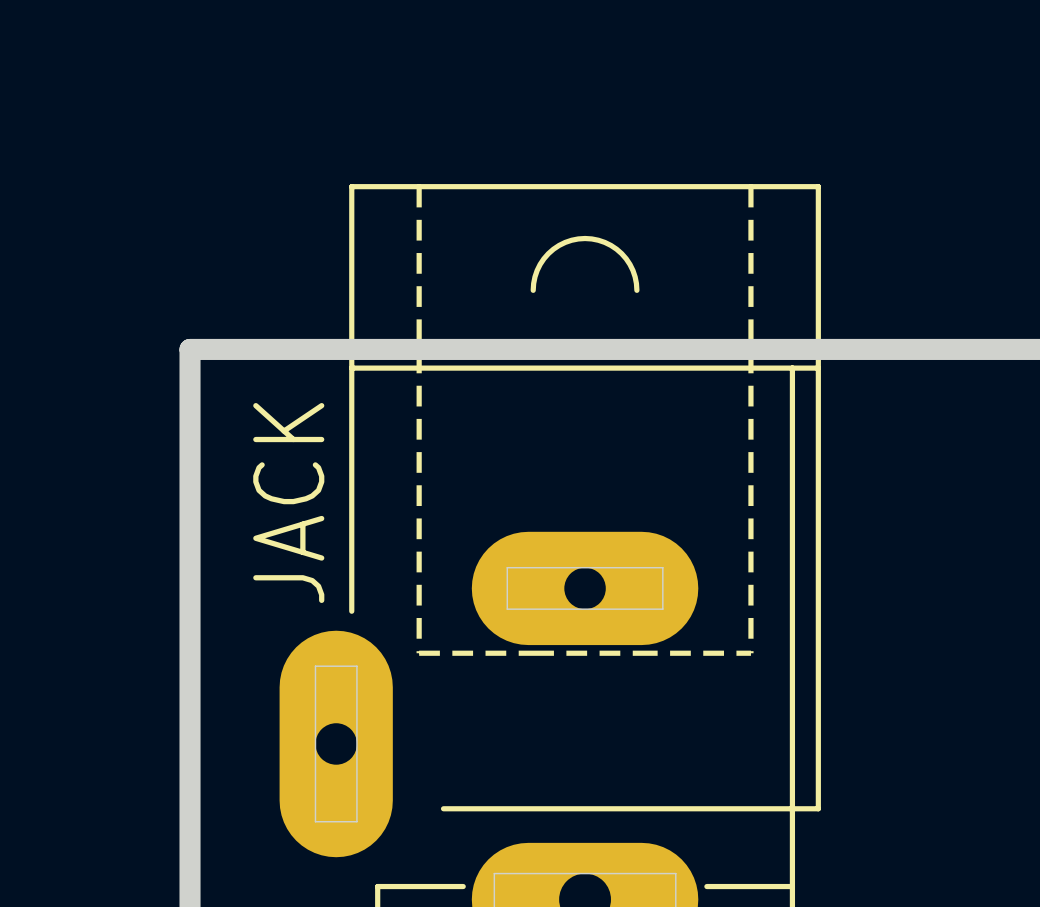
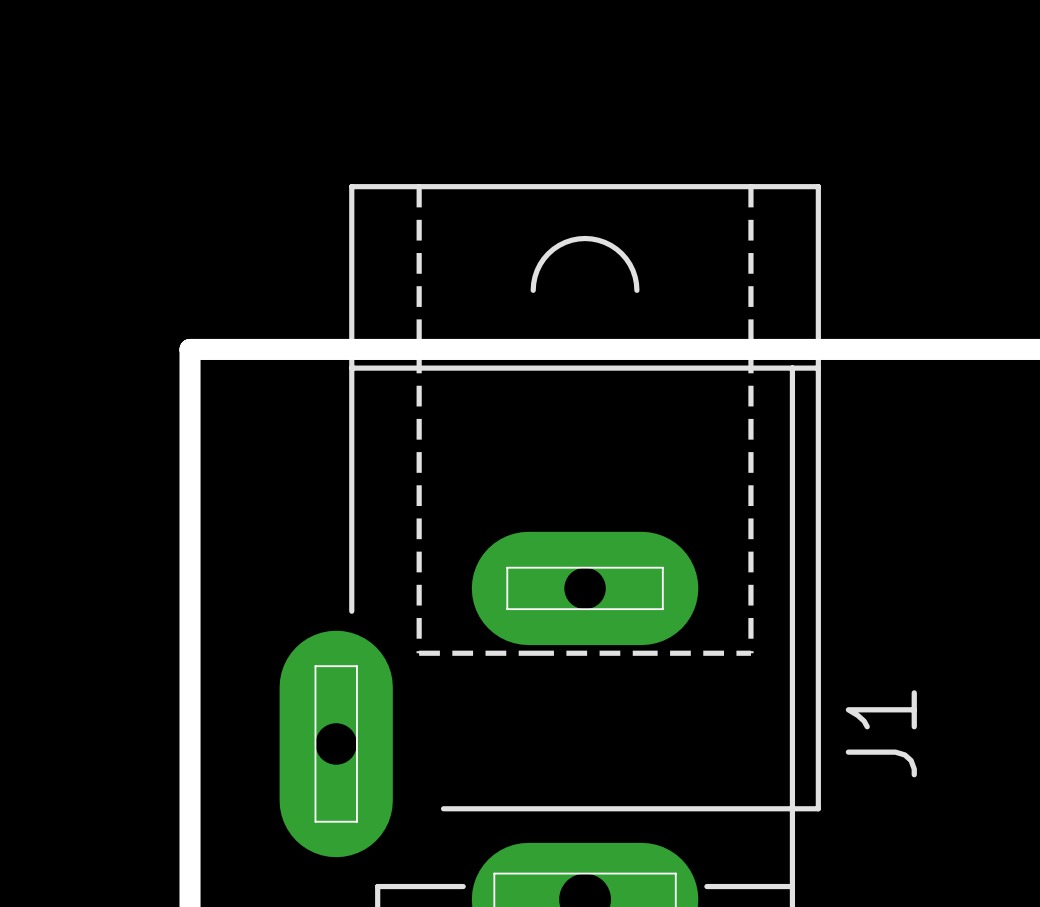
JACK name: JACK (288, 503) -> J1 (881, 733)

